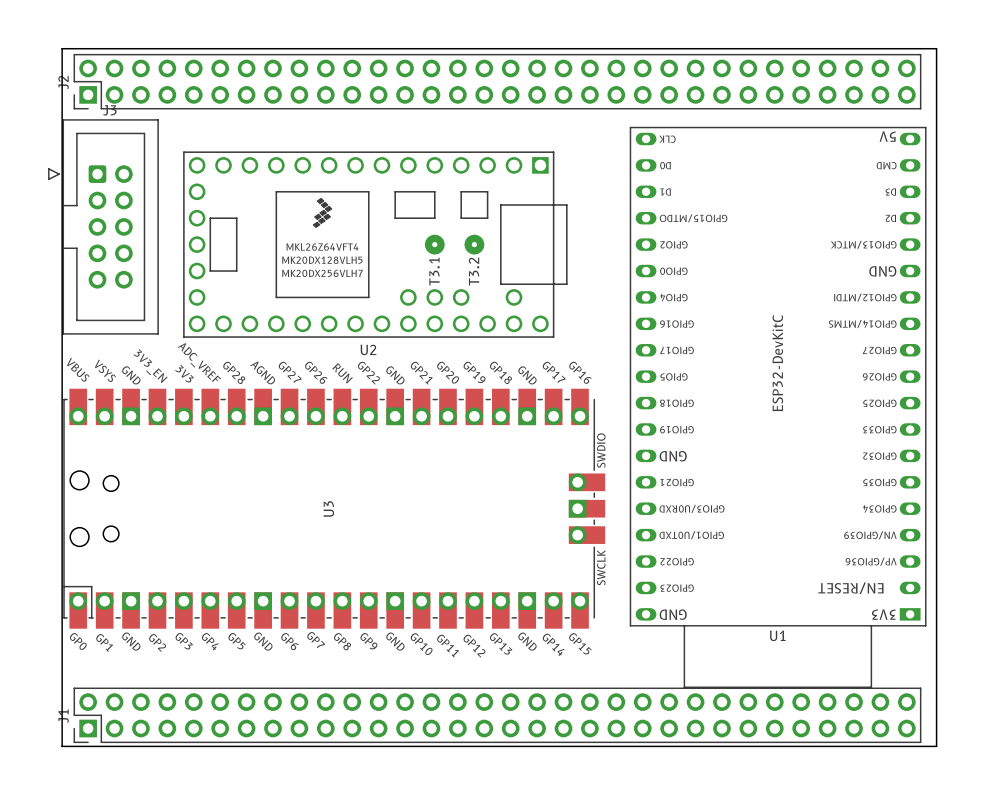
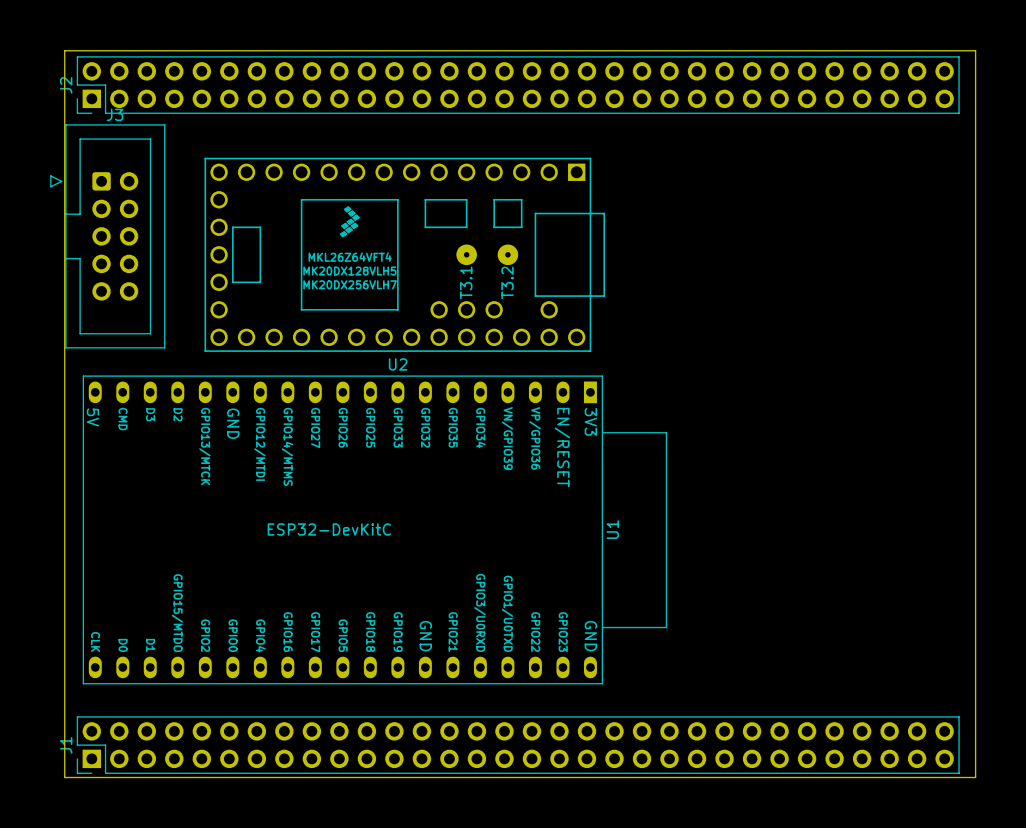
U2 position: (375, 244) -> (404, 254)
U1 rotation: 0° (778, 407) -> 90° counterclockwise (374, 529)
U1 position: (778, 407) -> (374, 529)
U3: (334, 508) -> none

